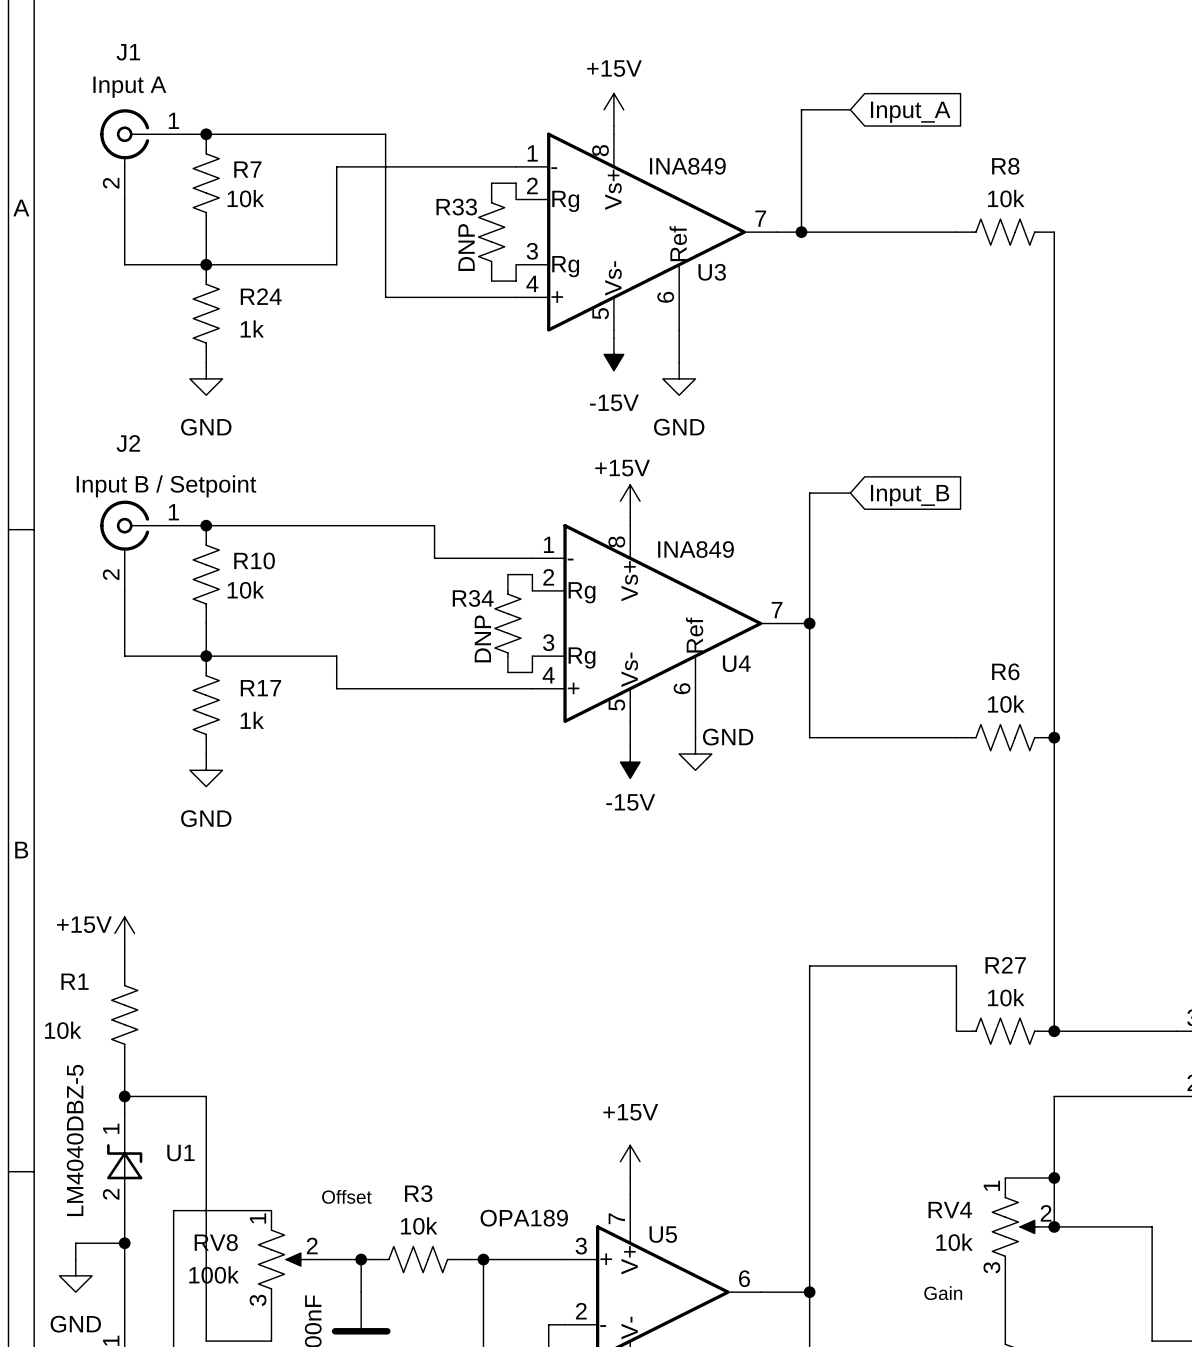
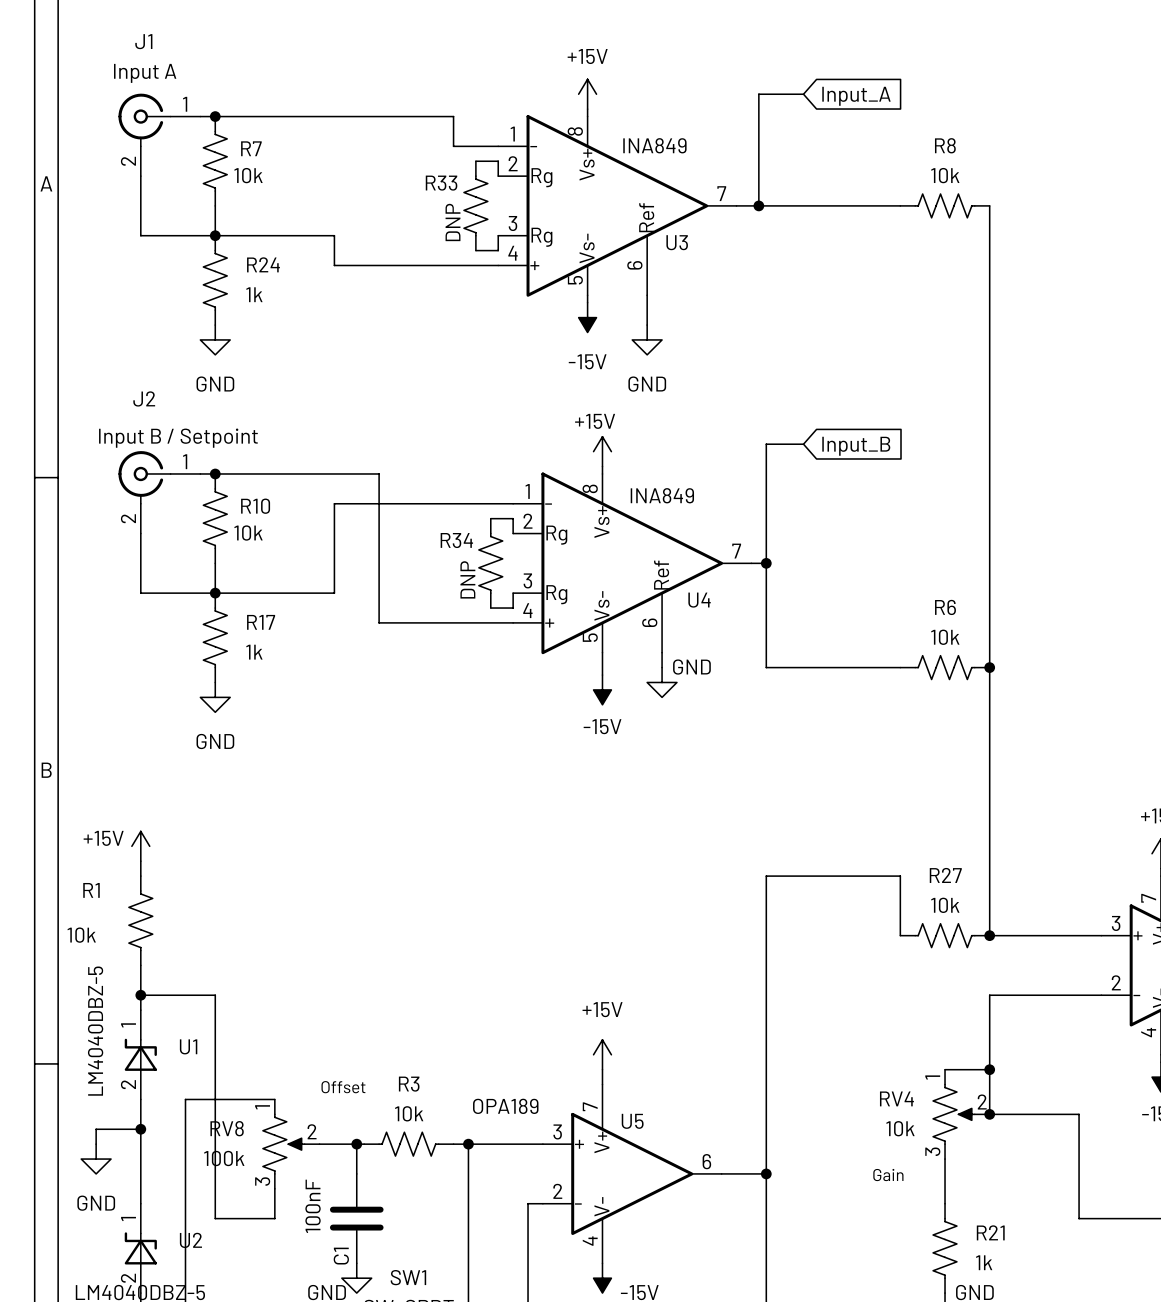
wire: (385, 134) (385, 297) -> (334, 235) (334, 265) (379, 265)
wire: (467, 166) (336, 166) (336, 264) -> (453, 146) (453, 116) (379, 116)
wire: (385, 525) (434, 525) (434, 558) -> (334, 593) (334, 503) (423, 503)
wire: (336, 656) (336, 688) (385, 688) -> (379, 473) (379, 622)

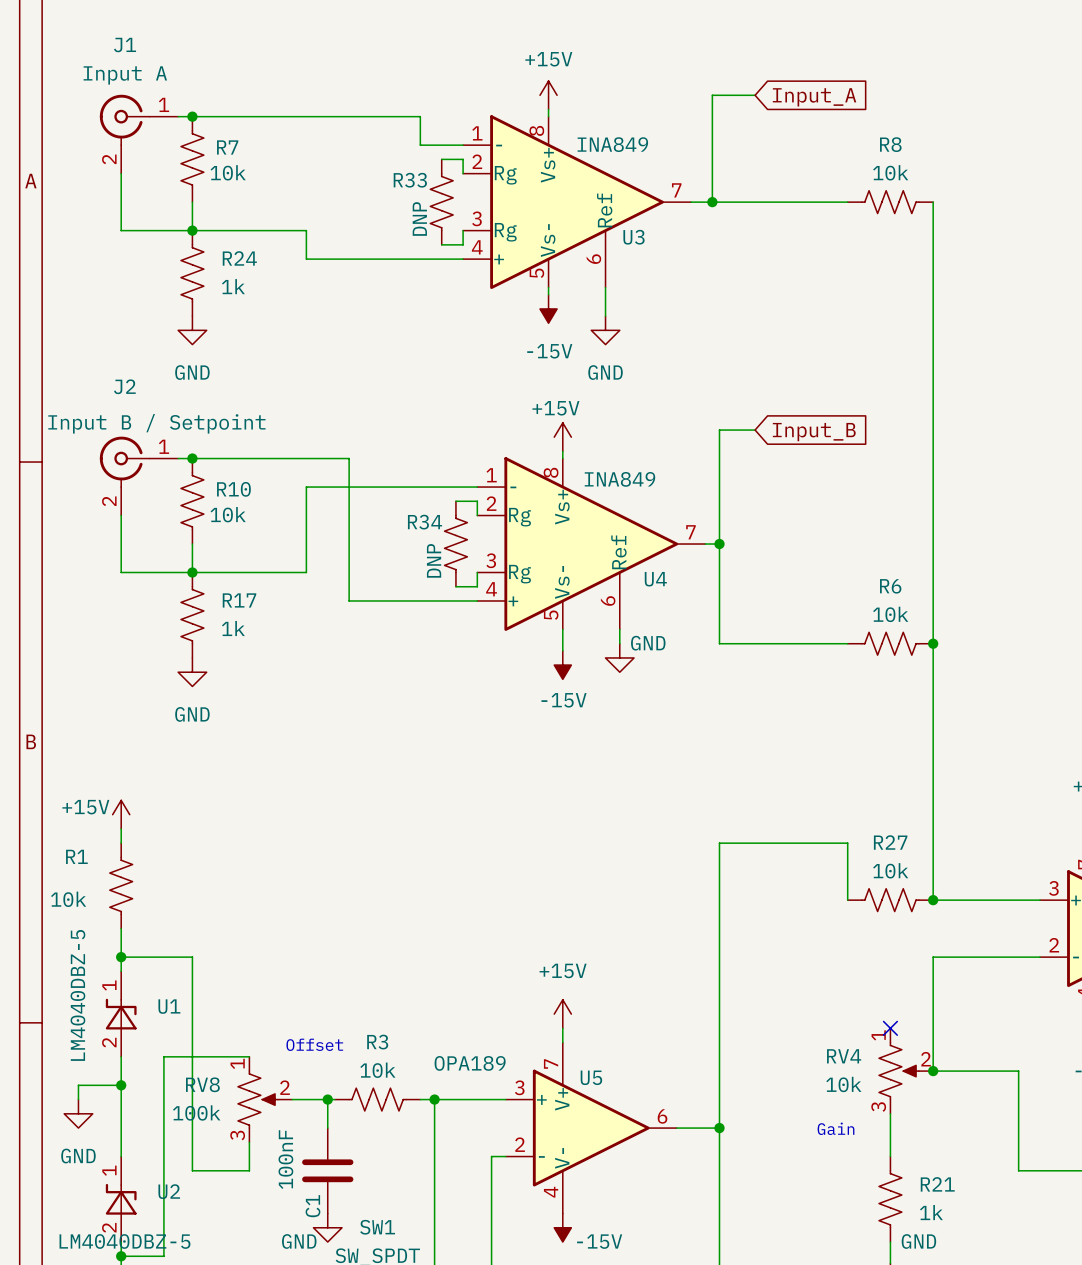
wire: (945, 1069) (989, 1069) -> none
no-connect mark: none -> (890, 1028)
junction: (989, 1069) -> none

